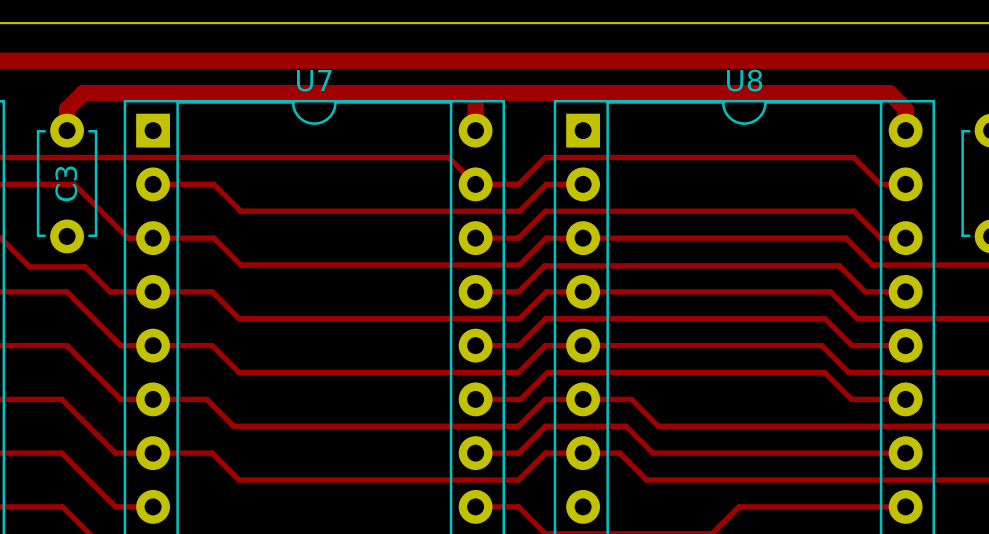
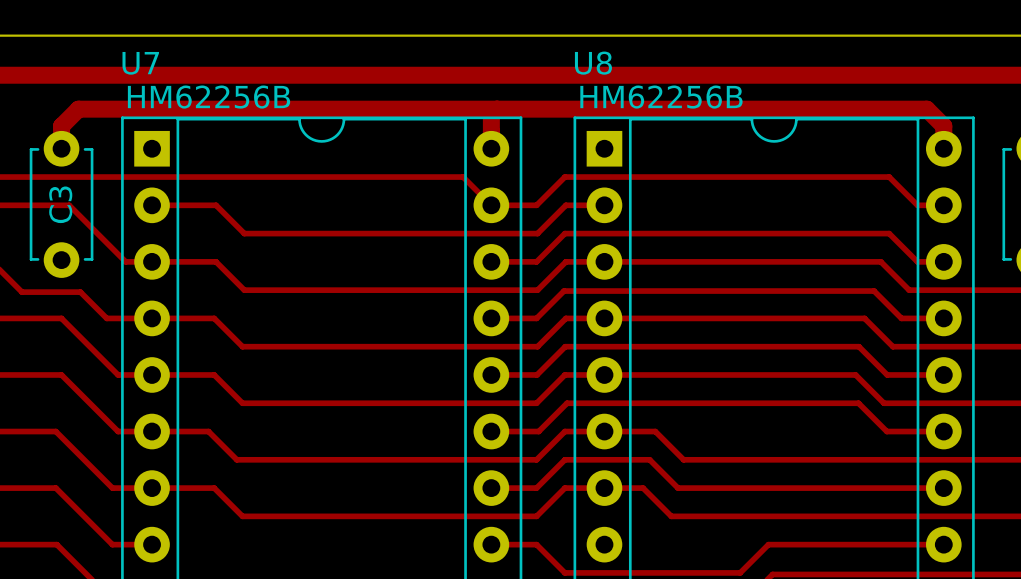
U7 name position: U7 (314, 80) -> U7 (140, 63)
U8 name position: U8 (744, 80) -> U8 (593, 63)
U7 value: none -> HM62256B (209, 97)
U8 value: none -> HM62256B (661, 97)

